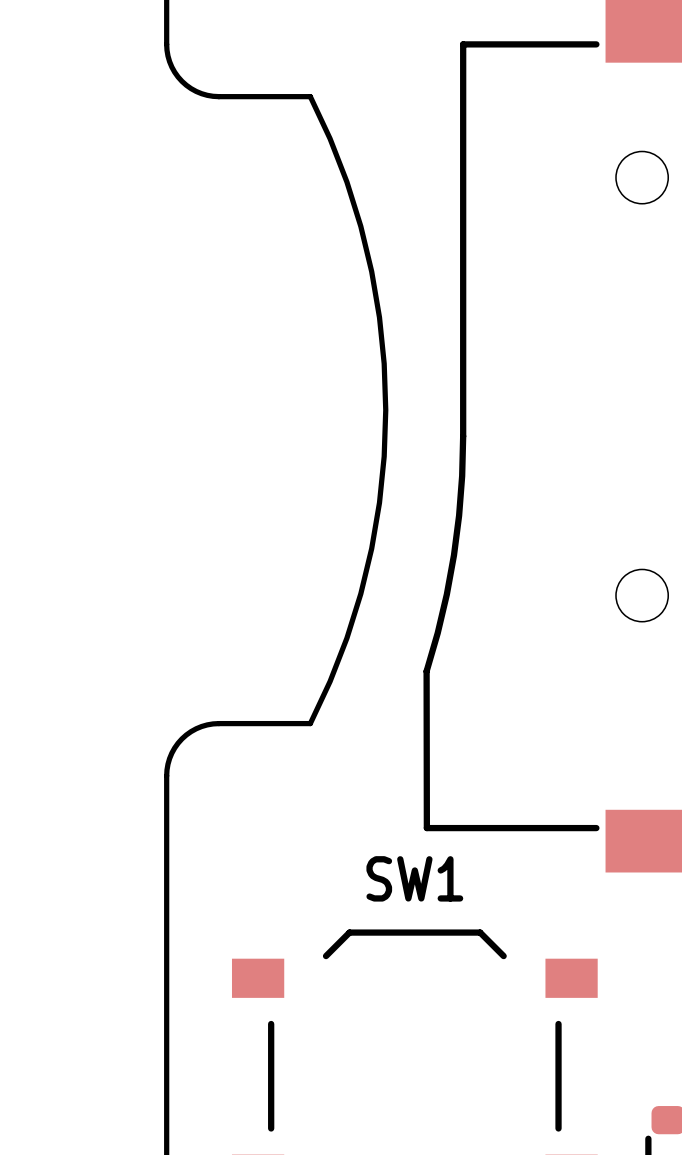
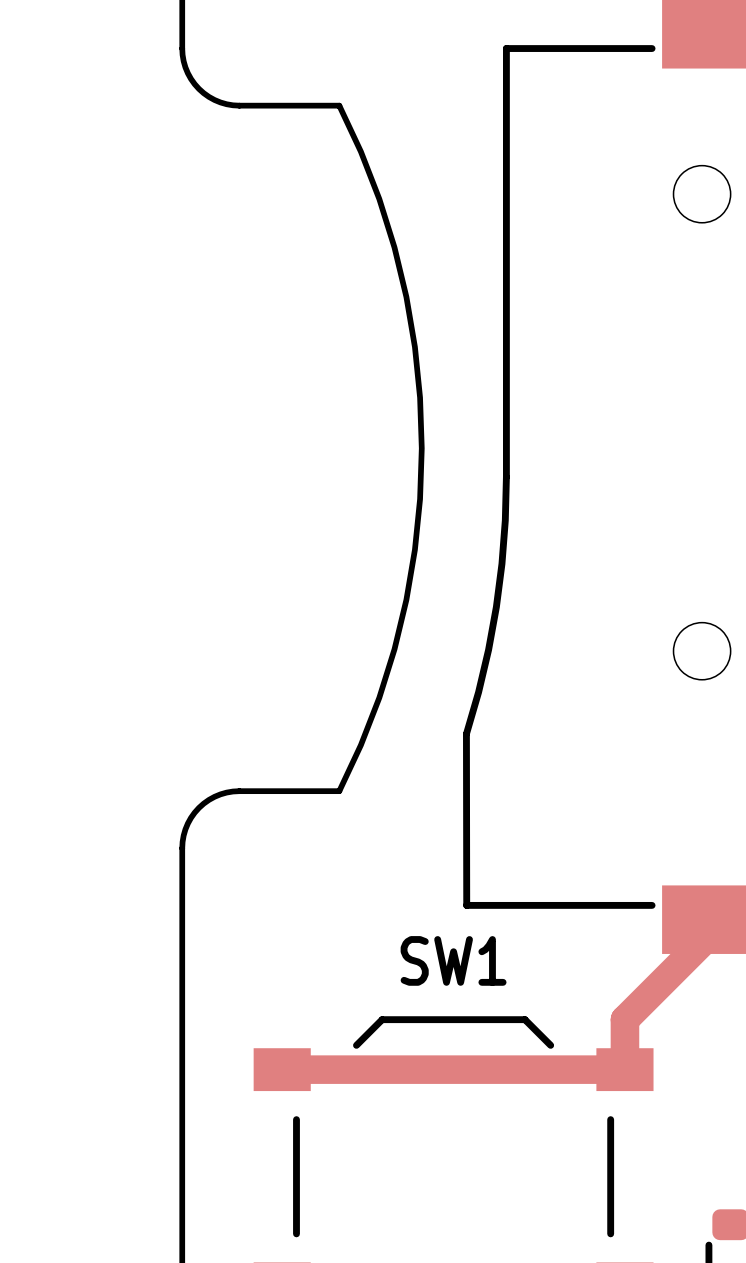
track: none -> (724, 919) (624, 1019) (624, 1069) (282, 1069)

